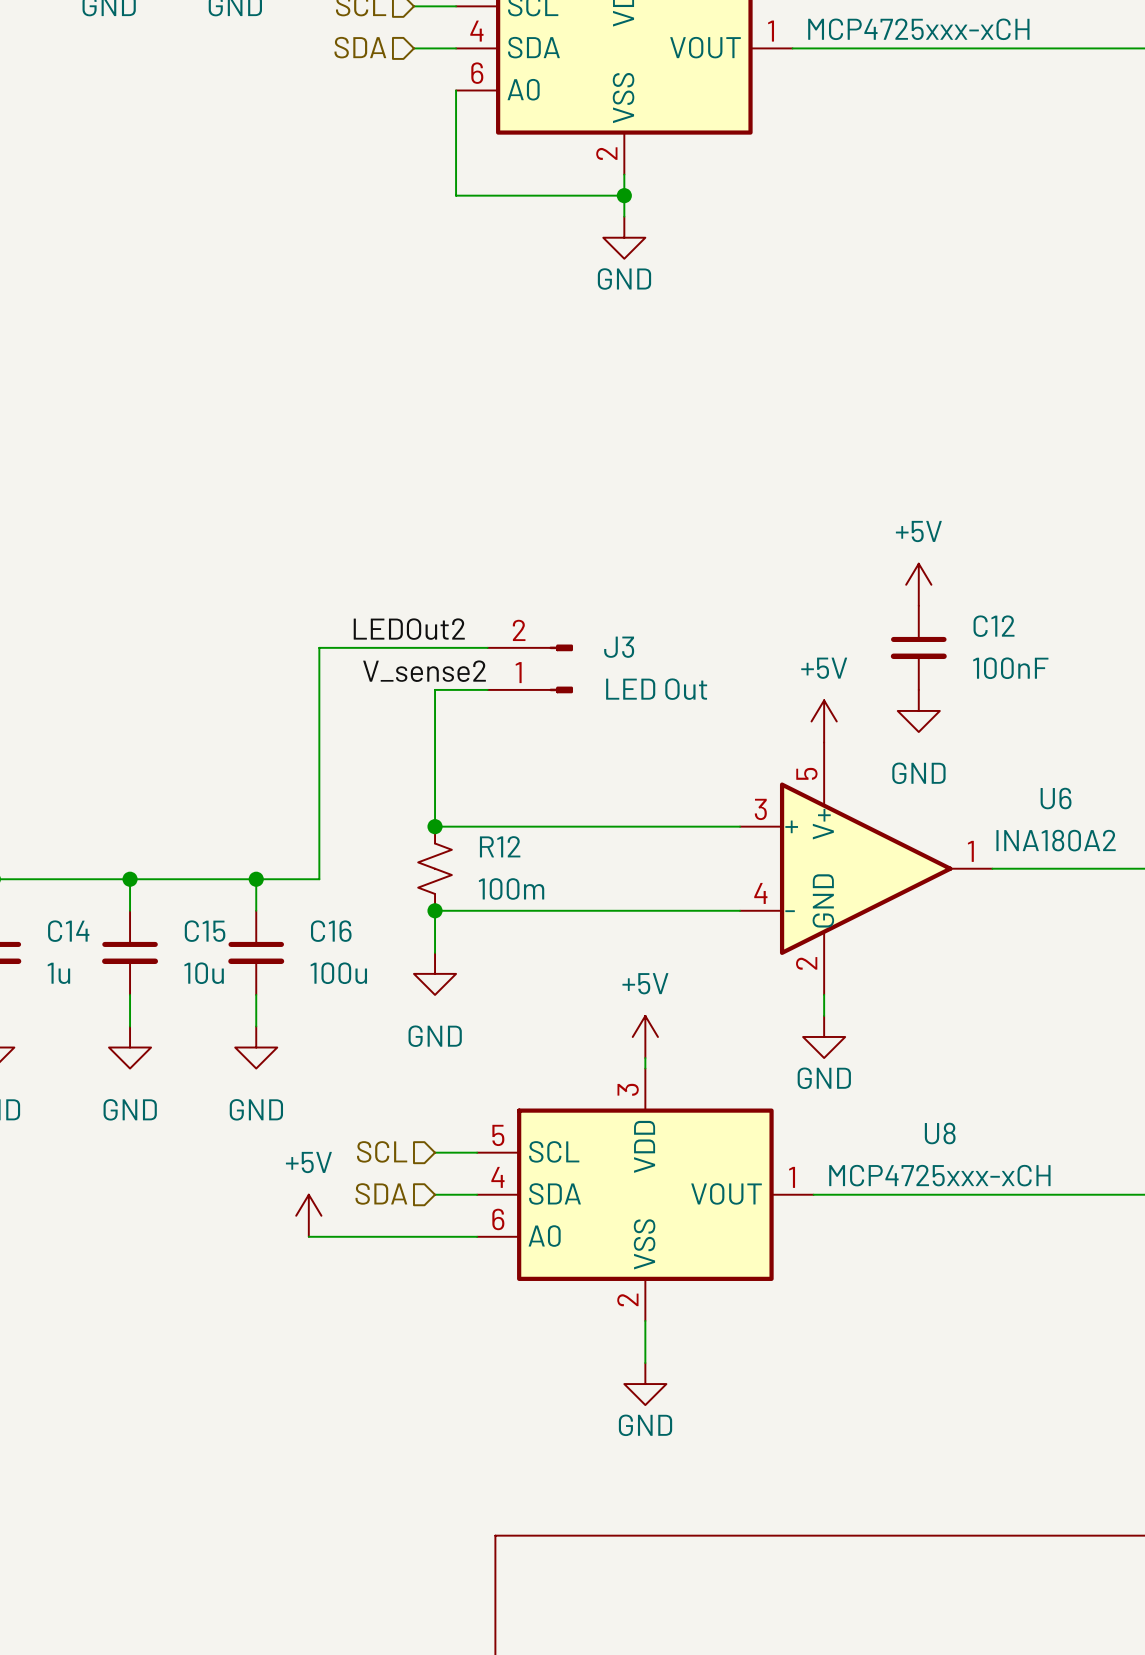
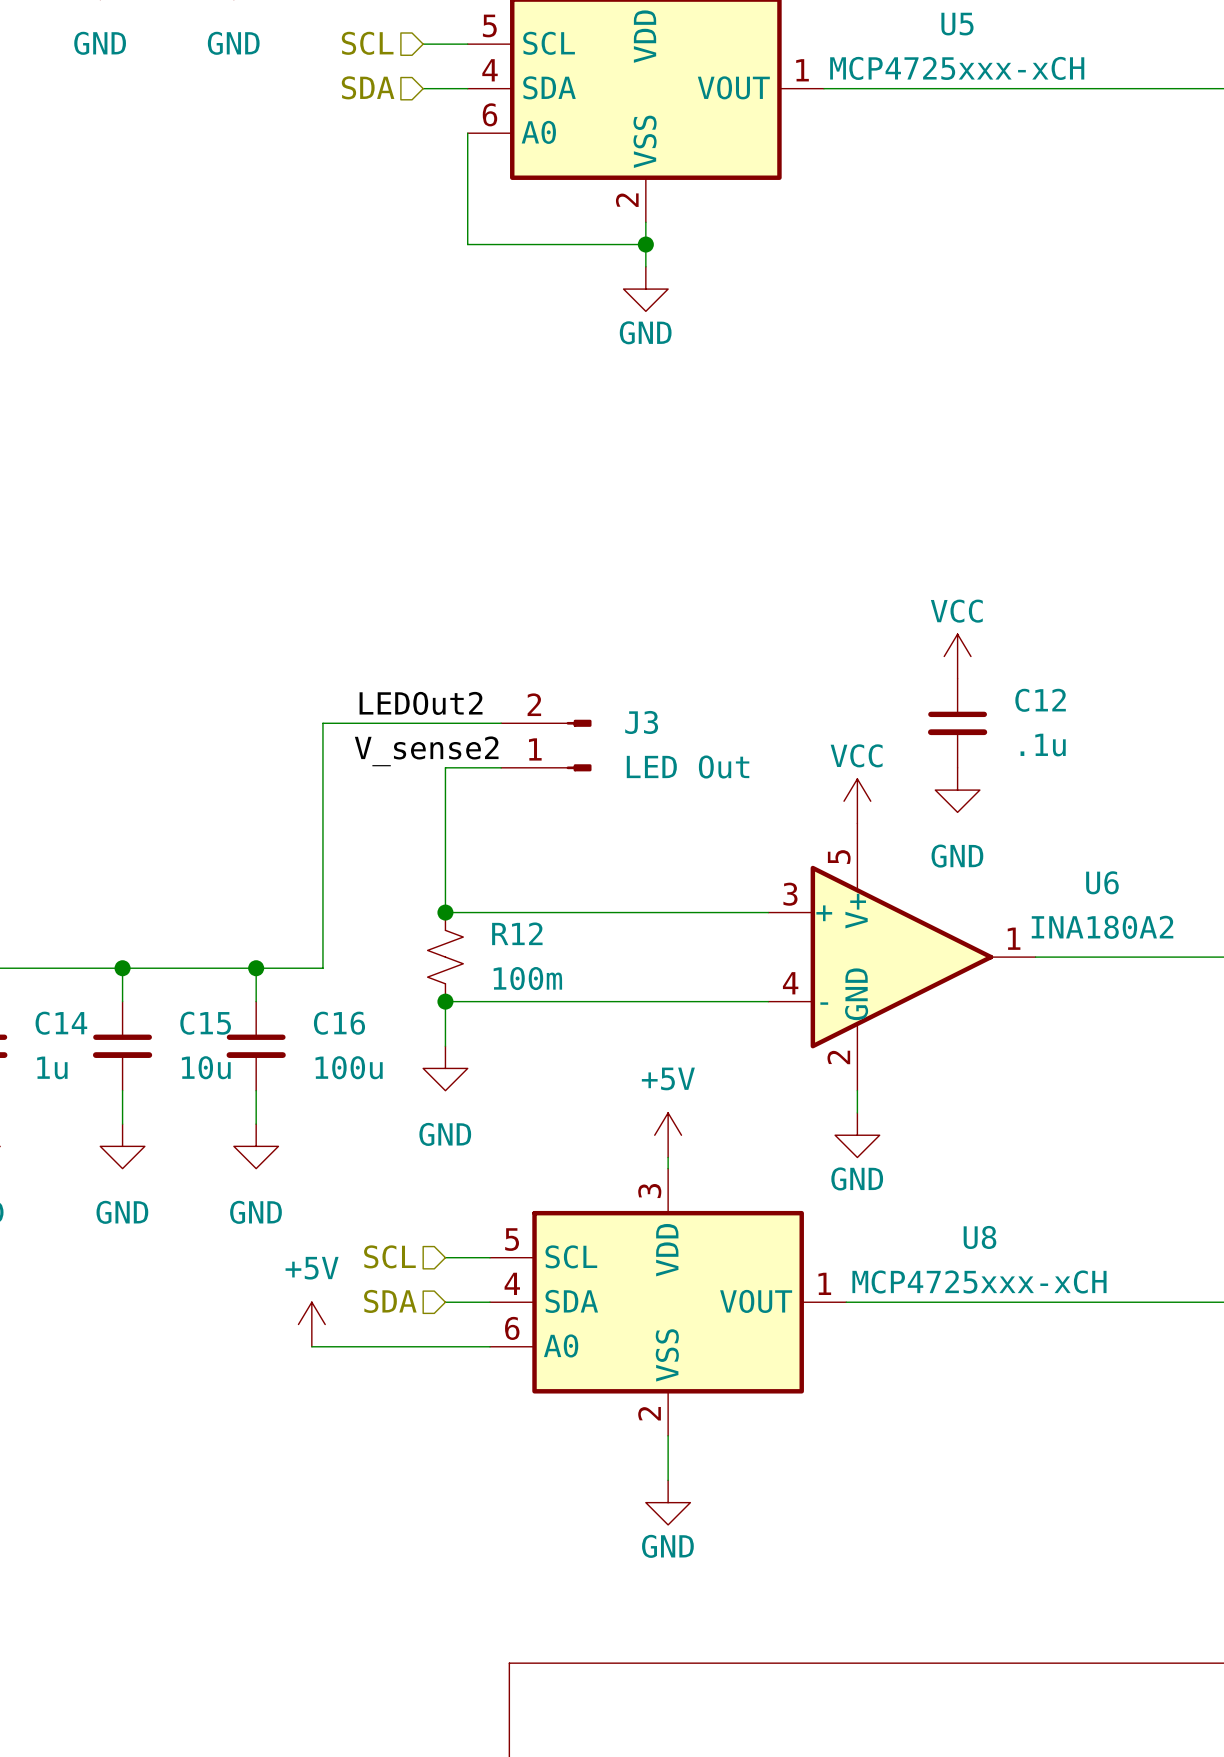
power symbol: +5V (918, 584) -> VCC (957, 656)
C12 value: 100nF (1010, 668) -> .1u (1043, 745)
power symbol: +5V (824, 721) -> VCC (857, 801)

